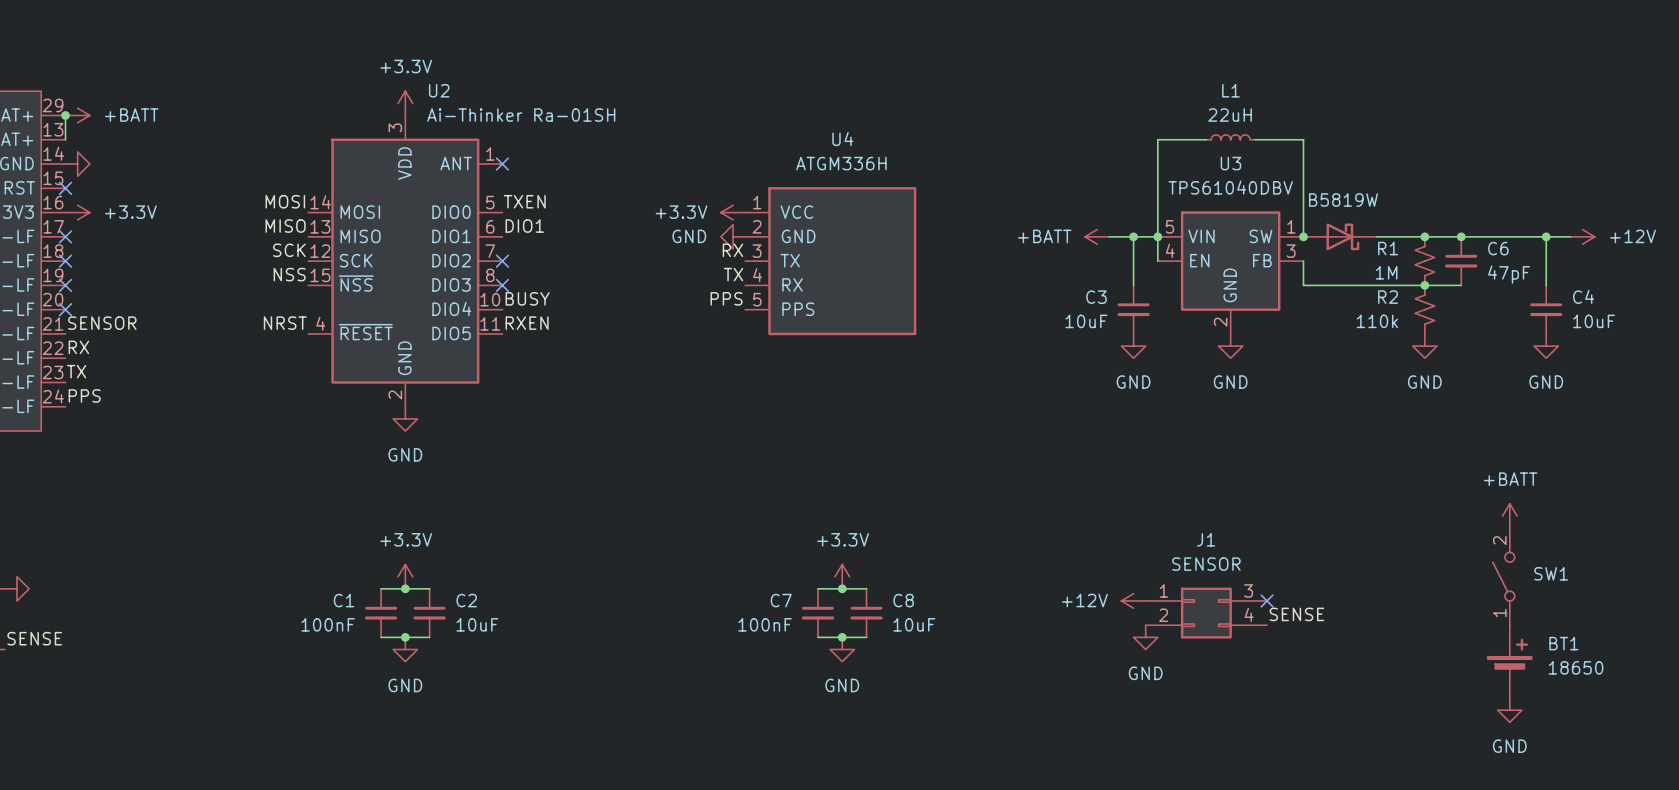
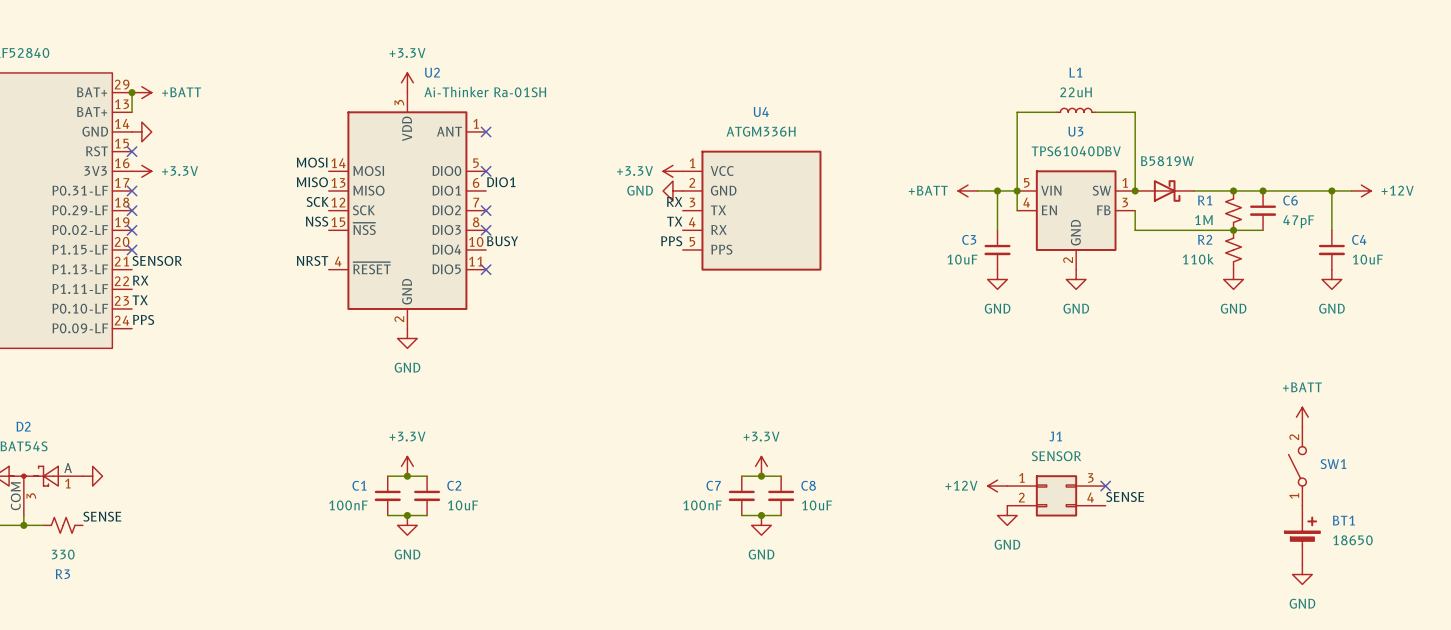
label: TXEN (524, 201) -> none
no-connect mark: none -> (486, 171)
label: RXEN (527, 323) -> none
no-connect mark: none -> (486, 269)

